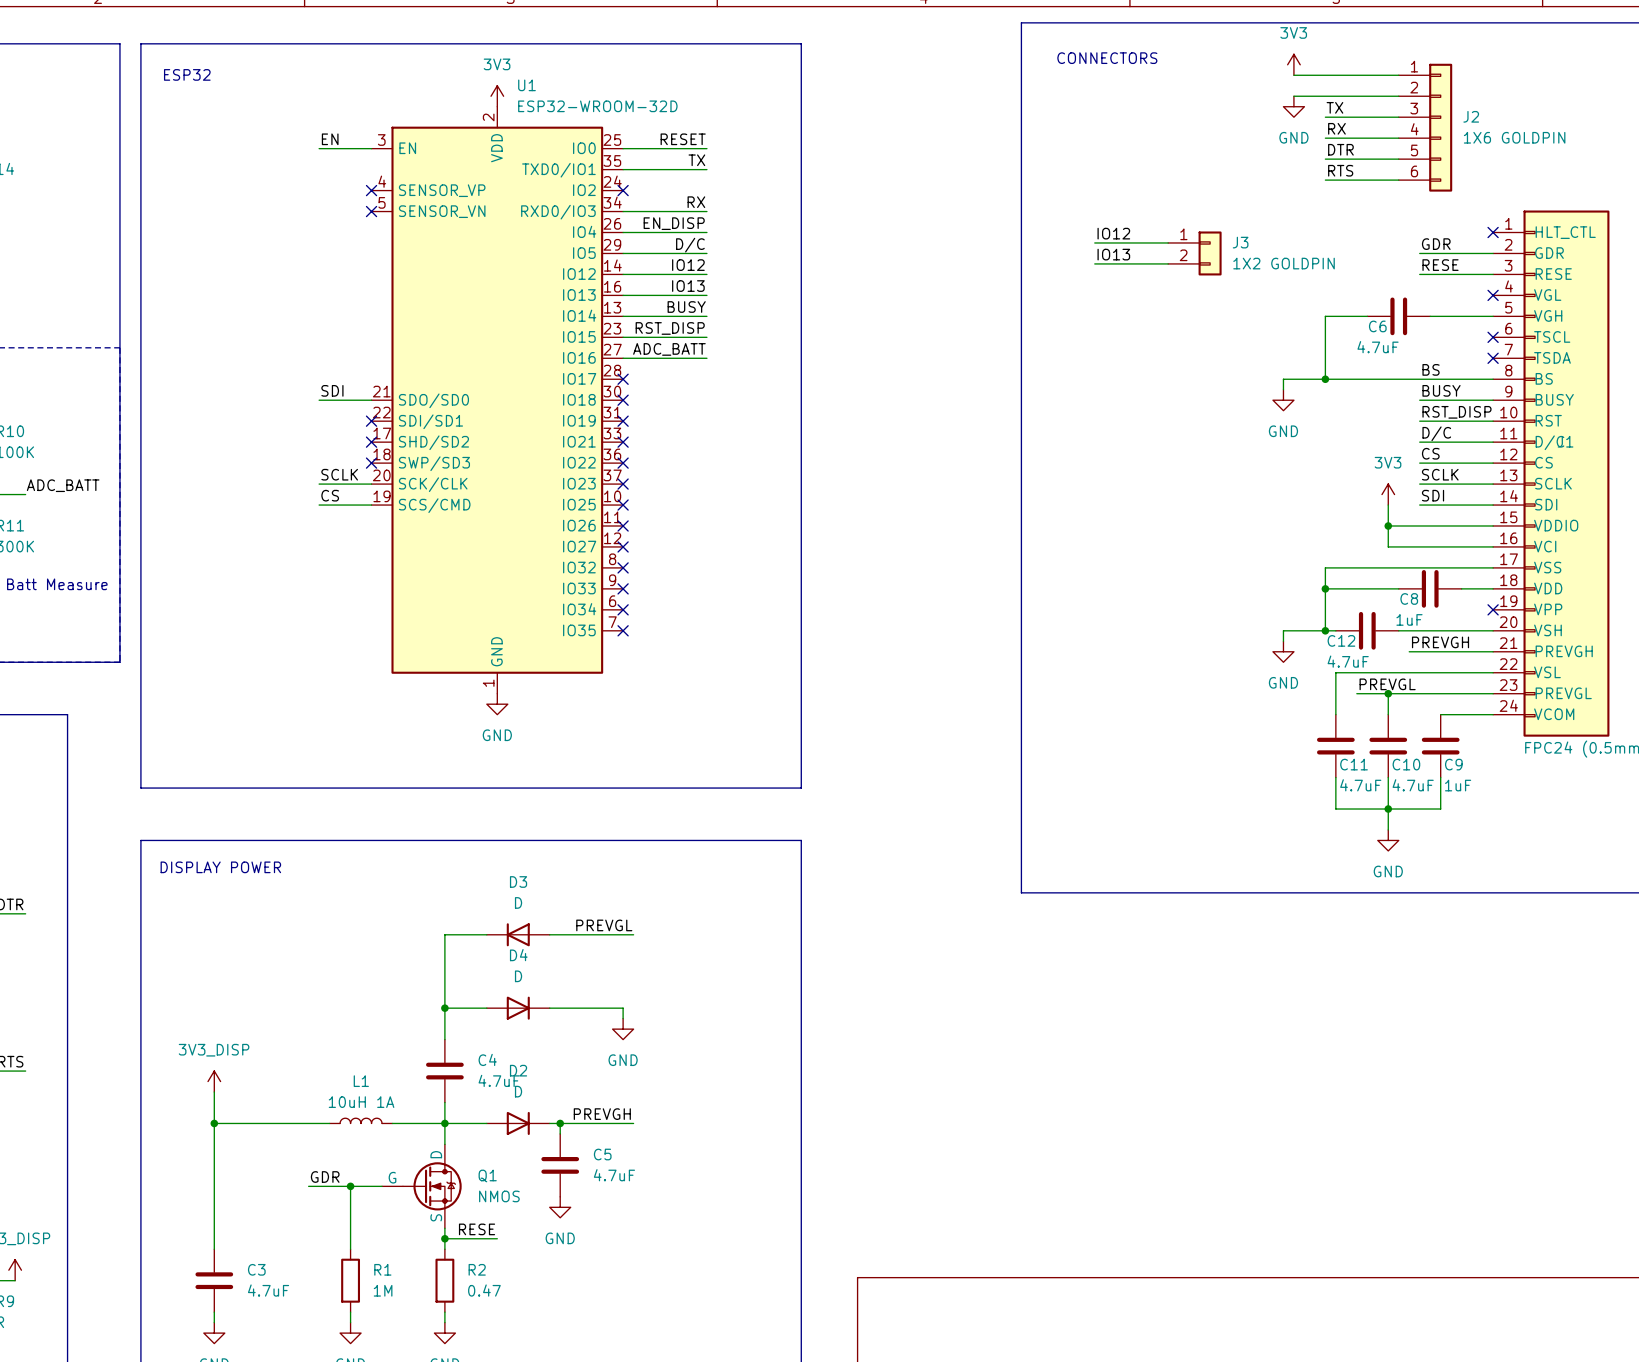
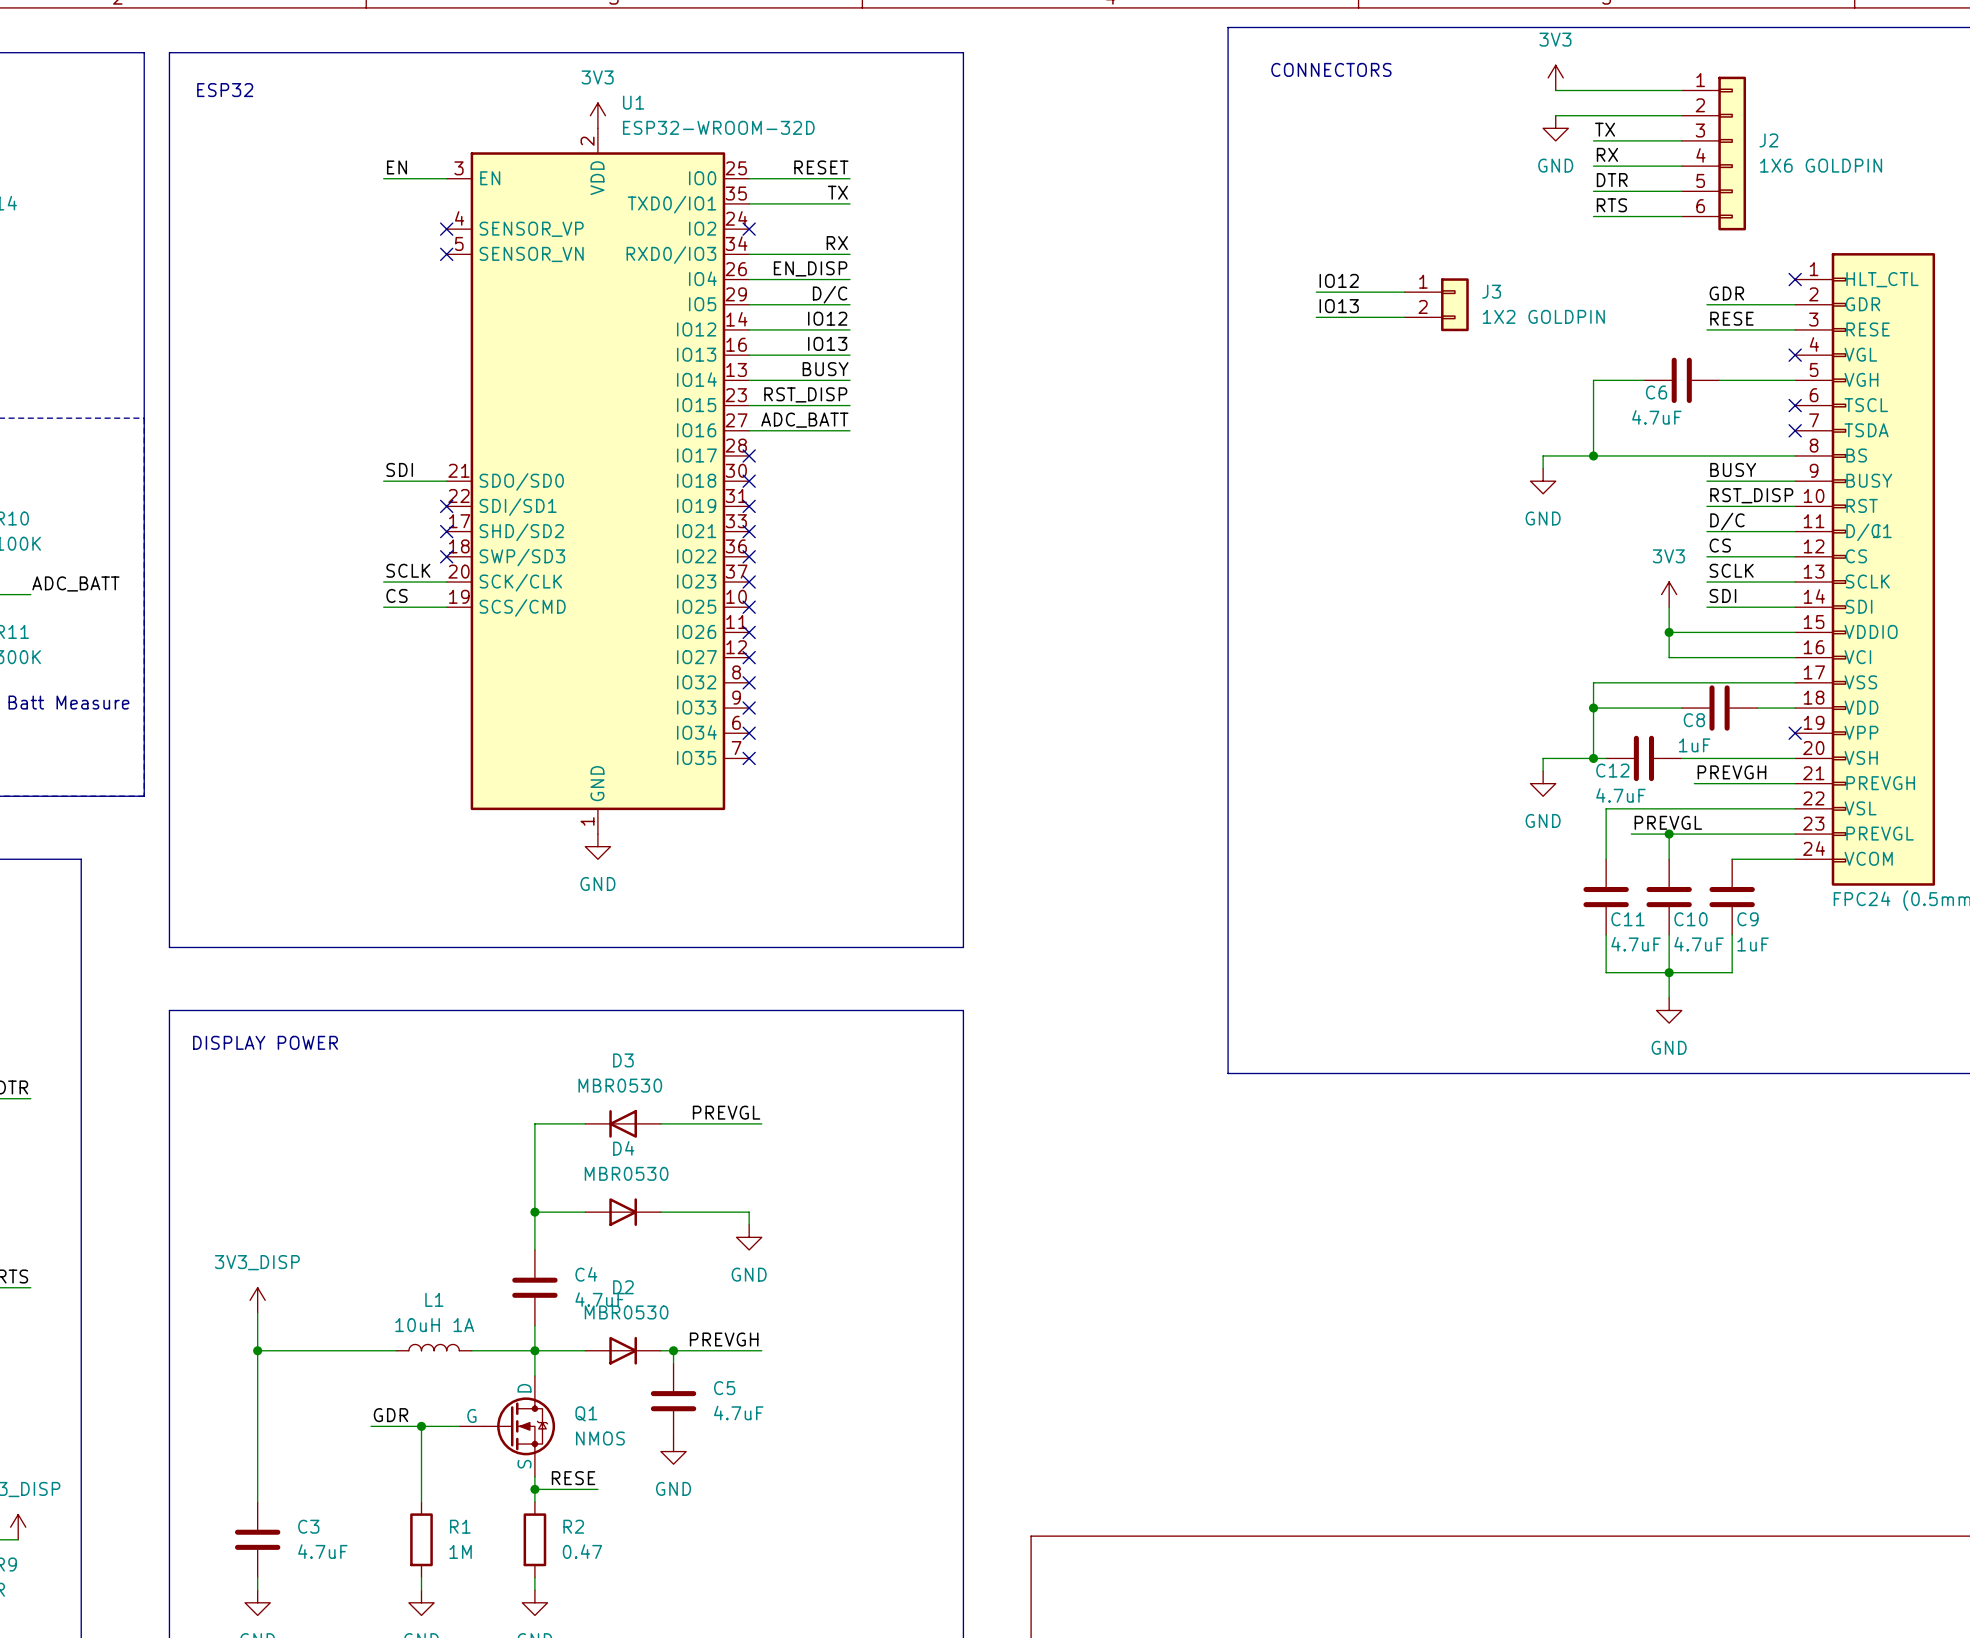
label: BS (1431, 369) -> none
D3 value: D (518, 902) -> MBR0530 (620, 1085)
D4 value: D (518, 976) -> MBR0530 (626, 1173)
D2 value: D (518, 1091) -> MBR0530 (626, 1312)

